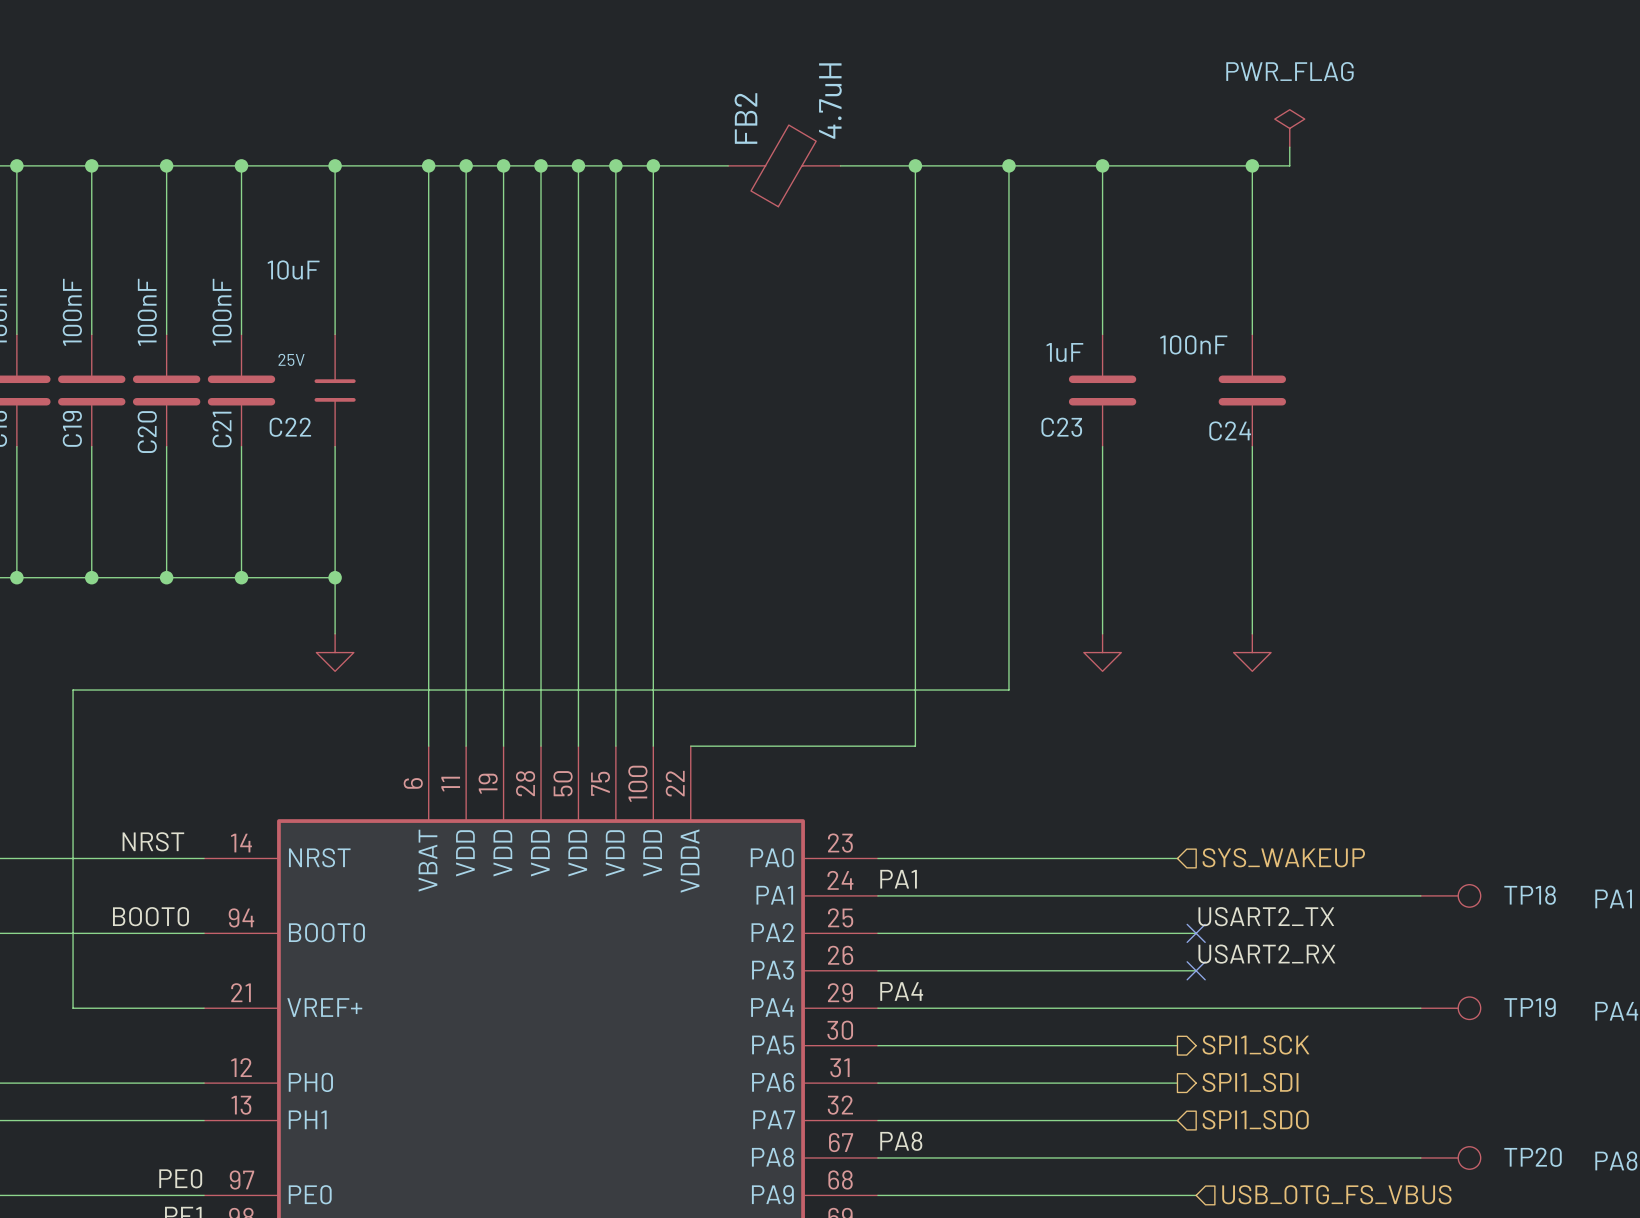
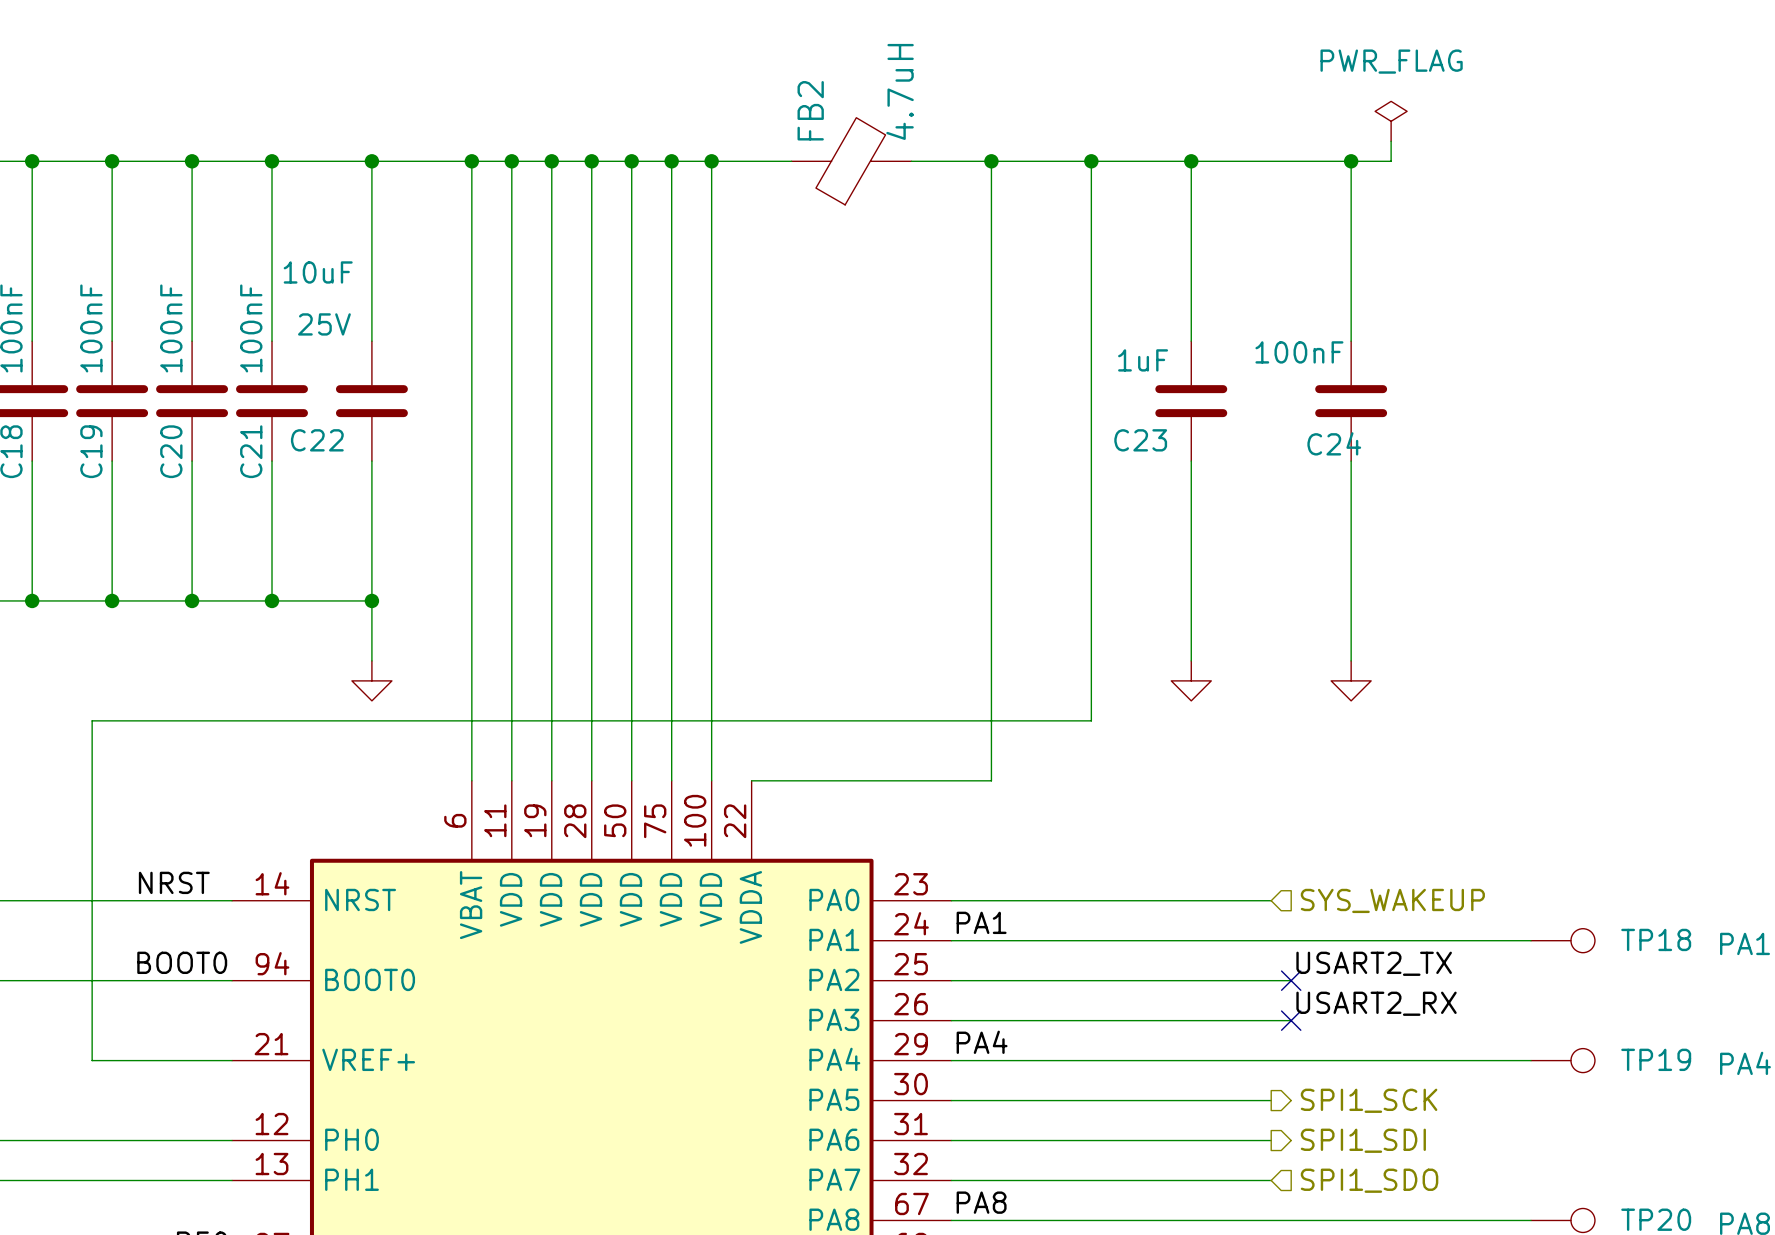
C22 text: none -> 25V (324, 324)
C22 symbol: [314, 334, 356, 447] -> [335, 341, 408, 462]
C22 text: 25V (291, 359) -> none

